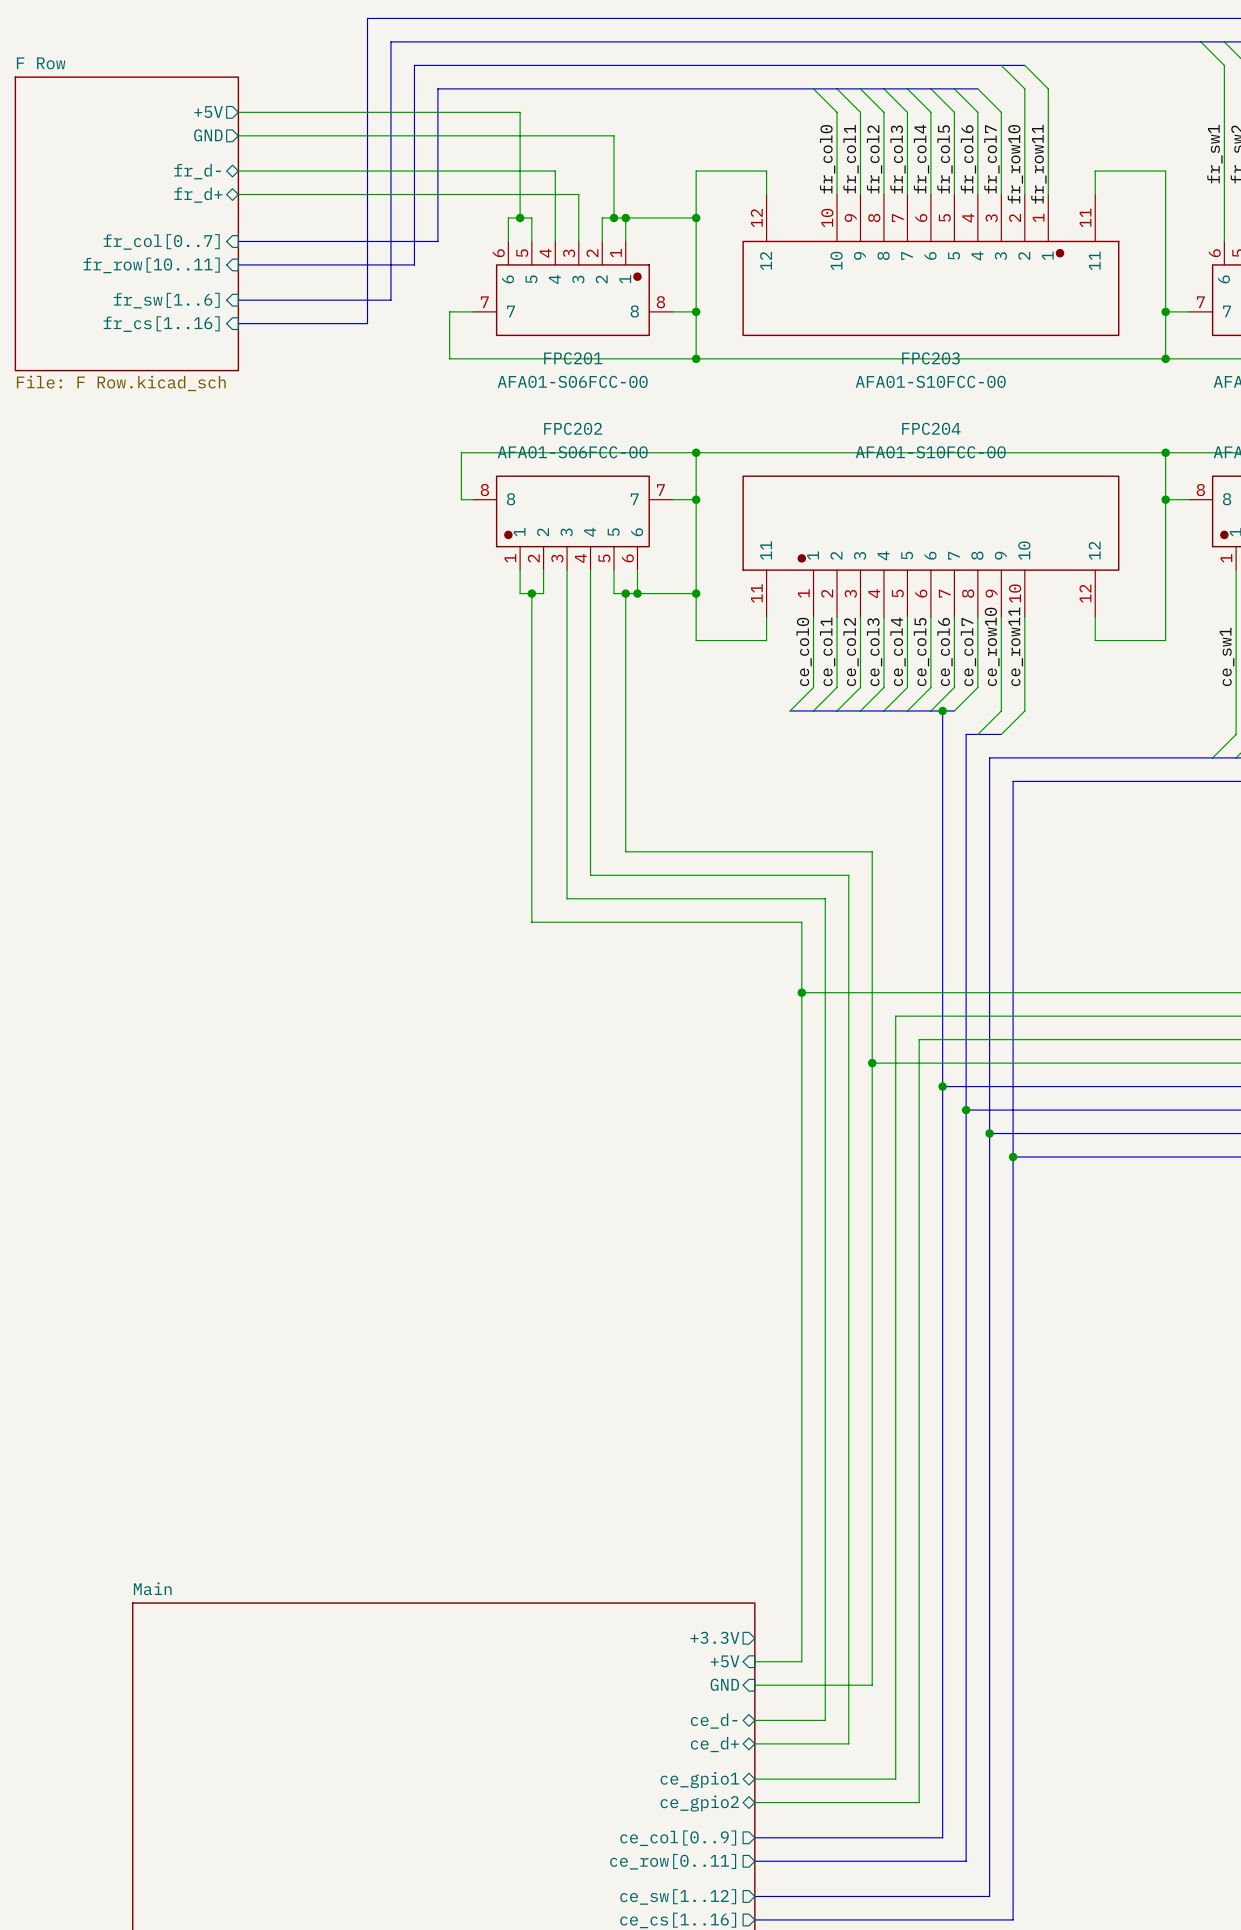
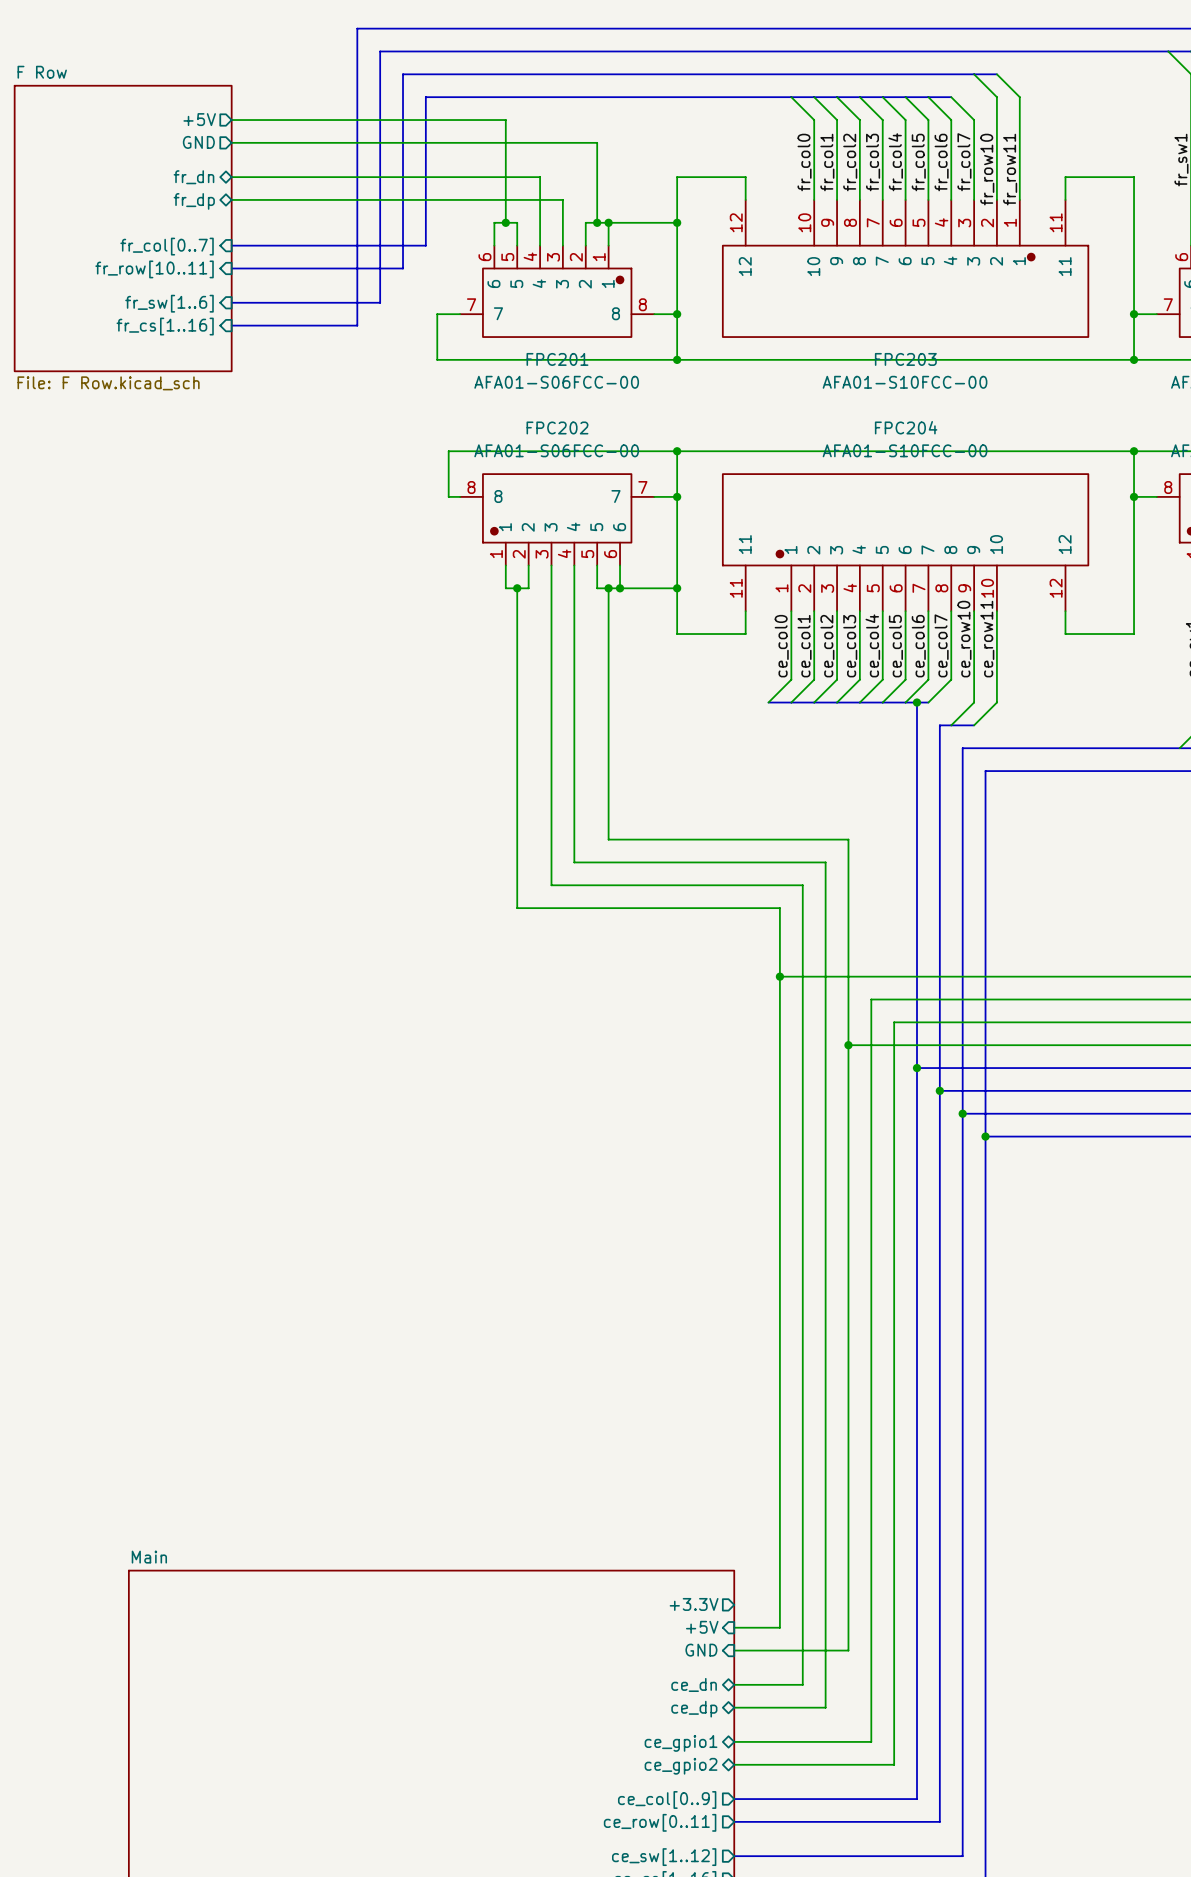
sheet pin: fr_d- (197, 171) -> fr_dn (193, 177)
sheet pin: fr_d+ (198, 195) -> fr_dp (194, 201)
sheet pin: ce_d- (714, 1721) -> ce_dn (694, 1684)
sheet pin: ce_d+ (714, 1744) -> ce_dp (694, 1709)

